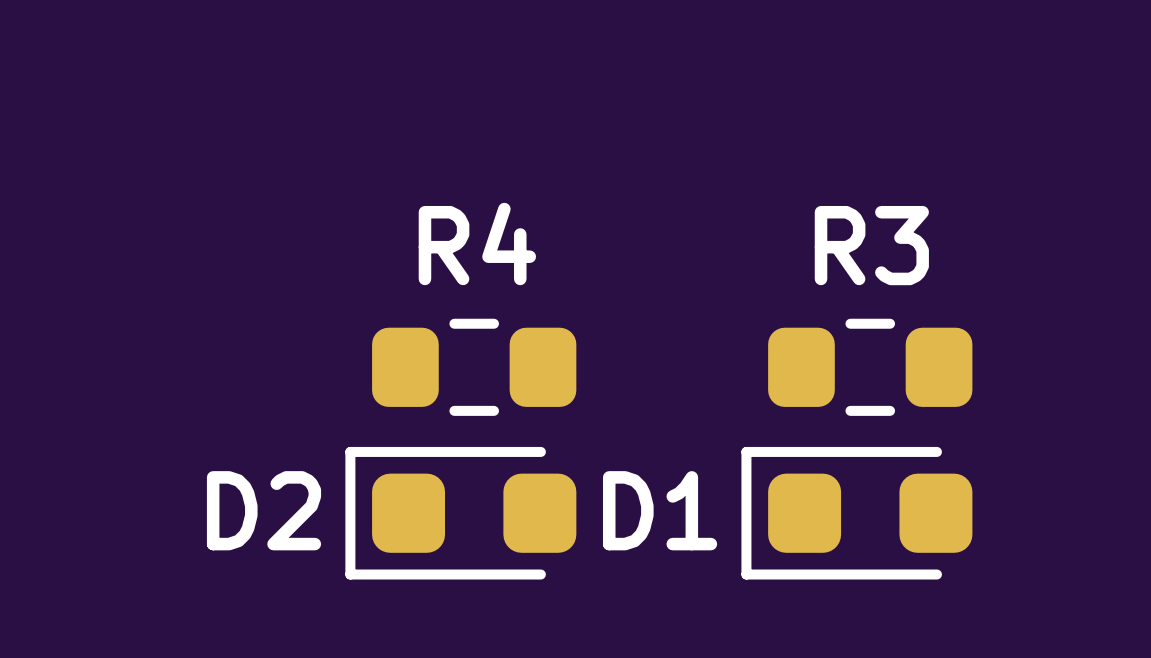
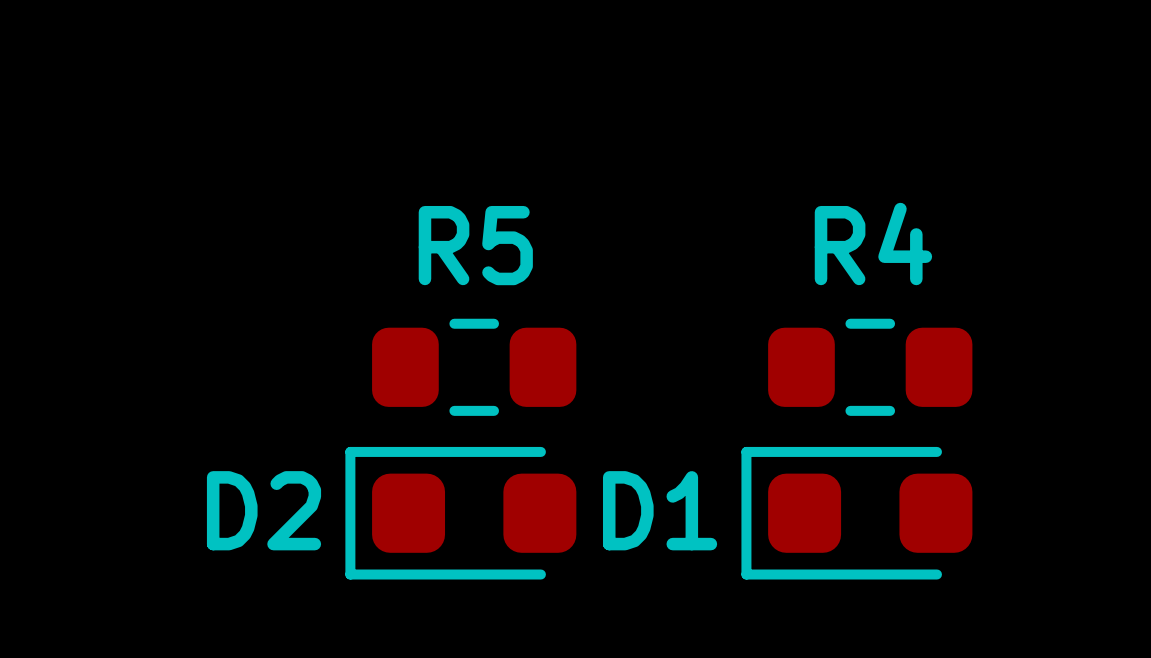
R4 name: R4 (477, 243) -> R5 (475, 245)
R3 name: R3 (871, 245) -> R4 (873, 243)

